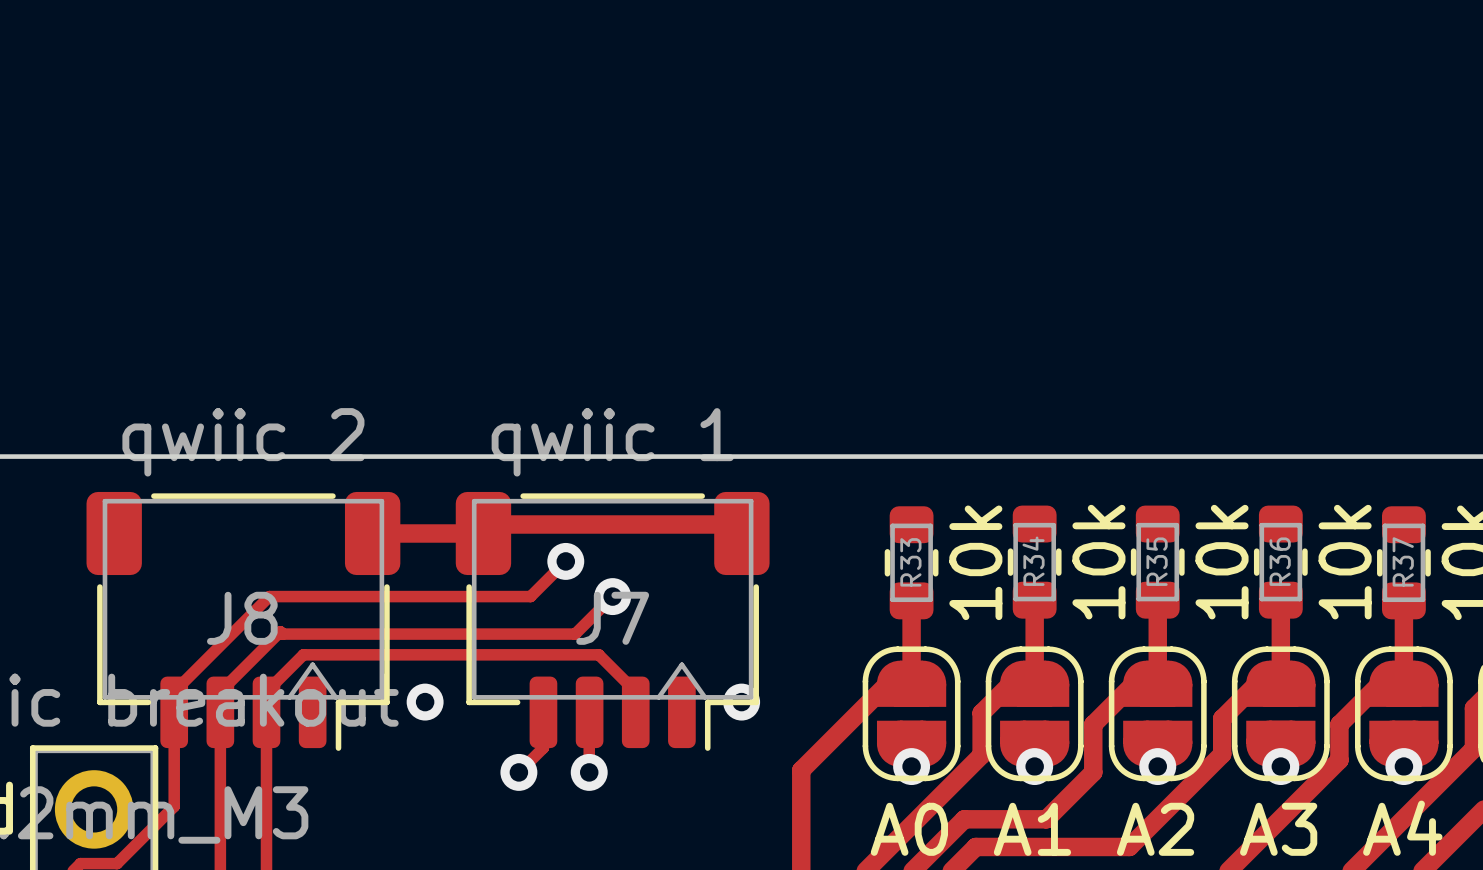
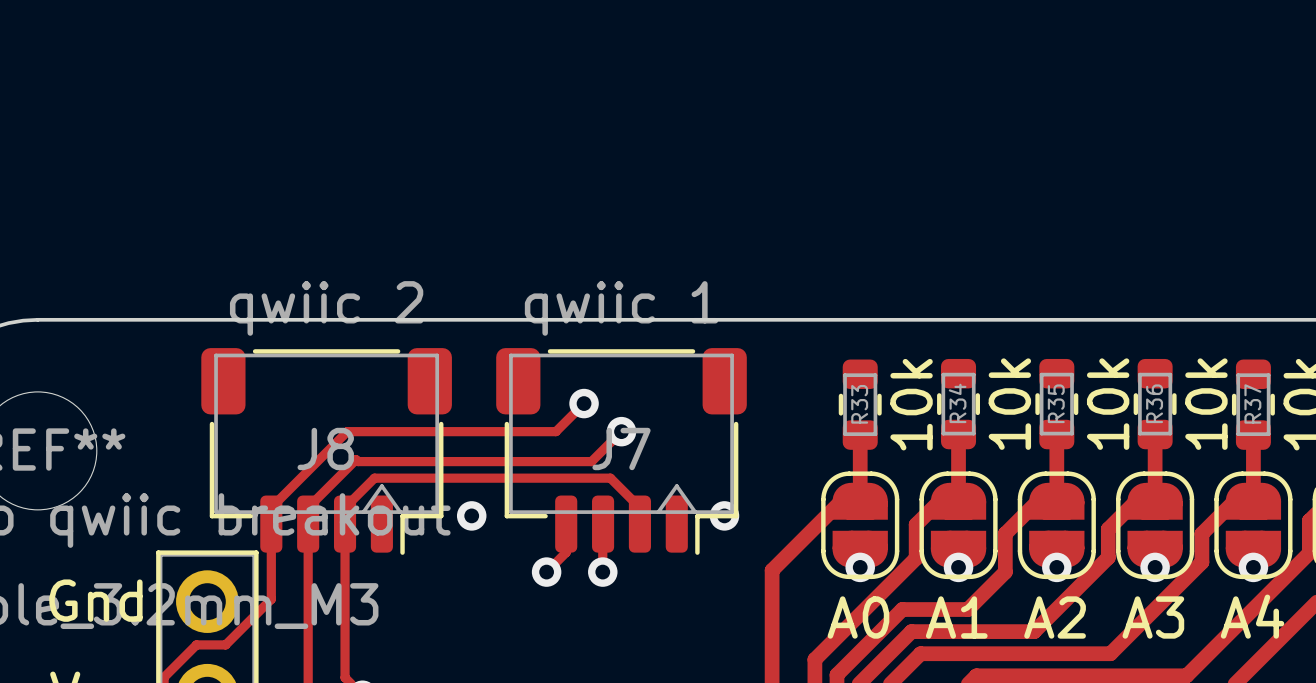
track: (372, 533) (483, 533) (492, 524) (732, 524) (741, 533) -> none

